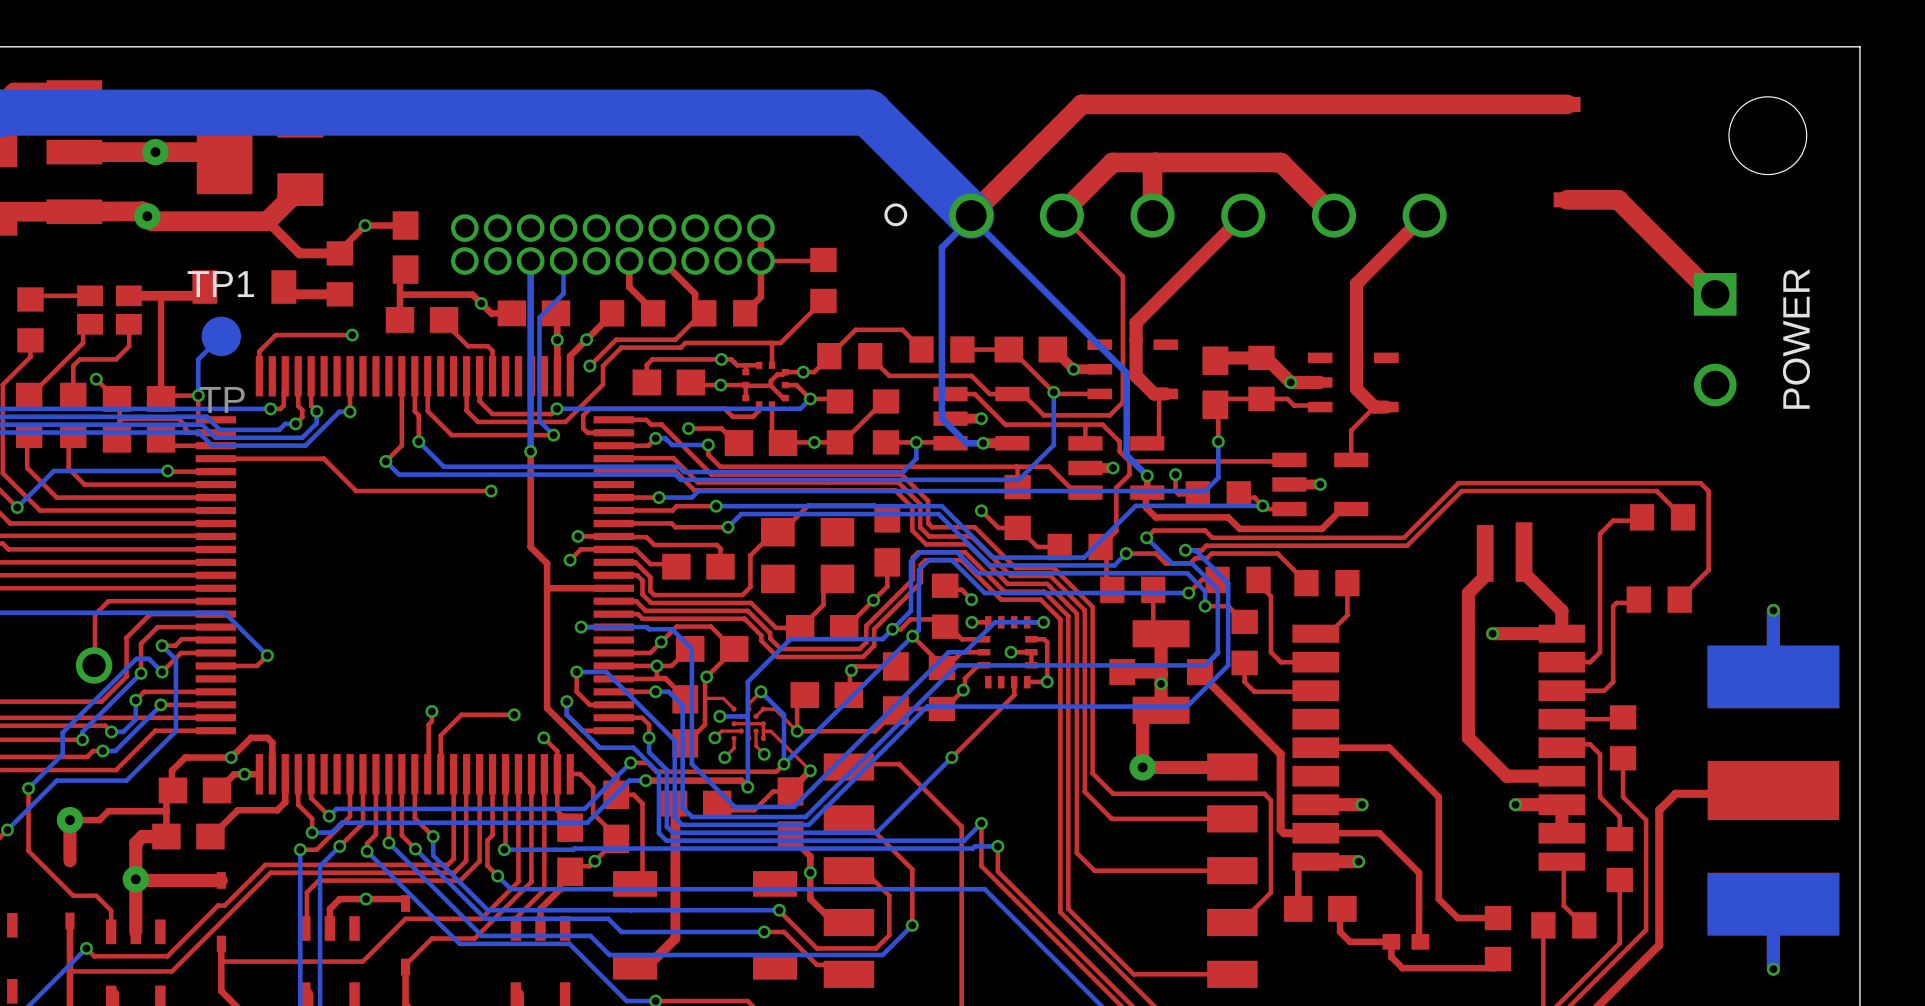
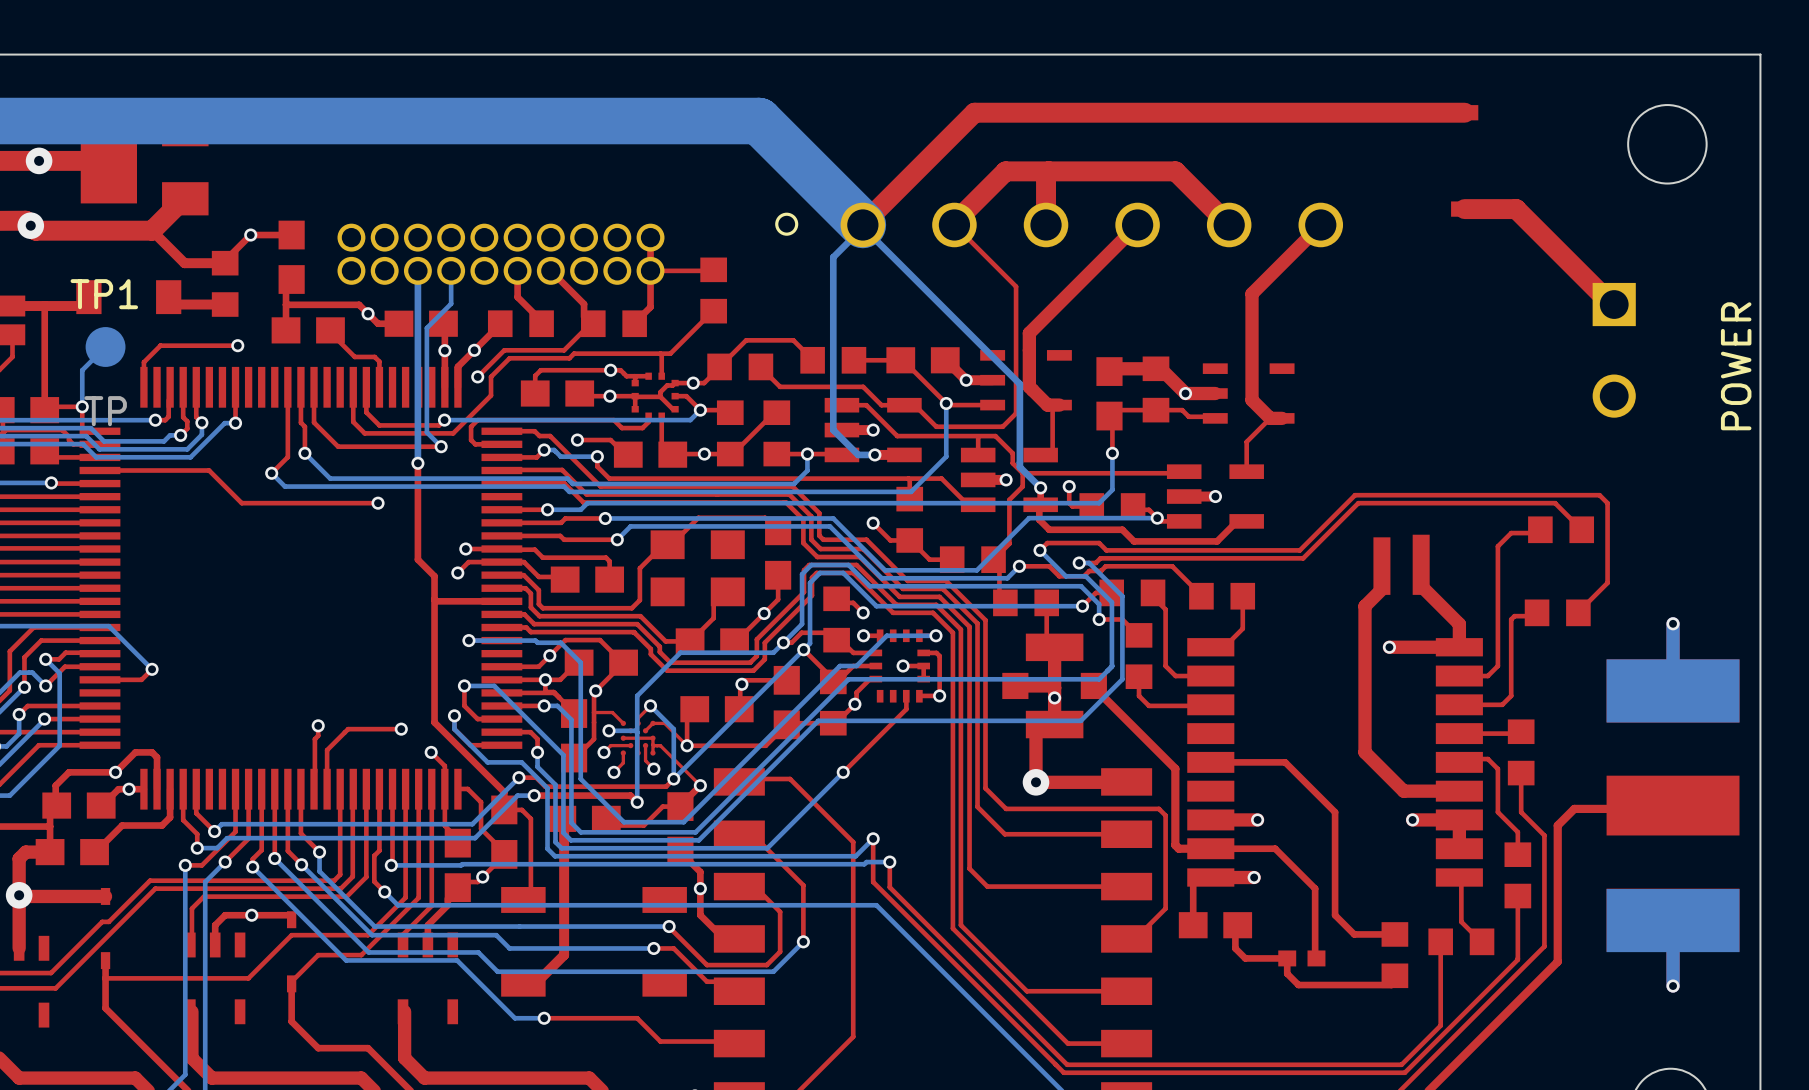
text position: POWER (1796, 339) -> POWER (1736, 366)

